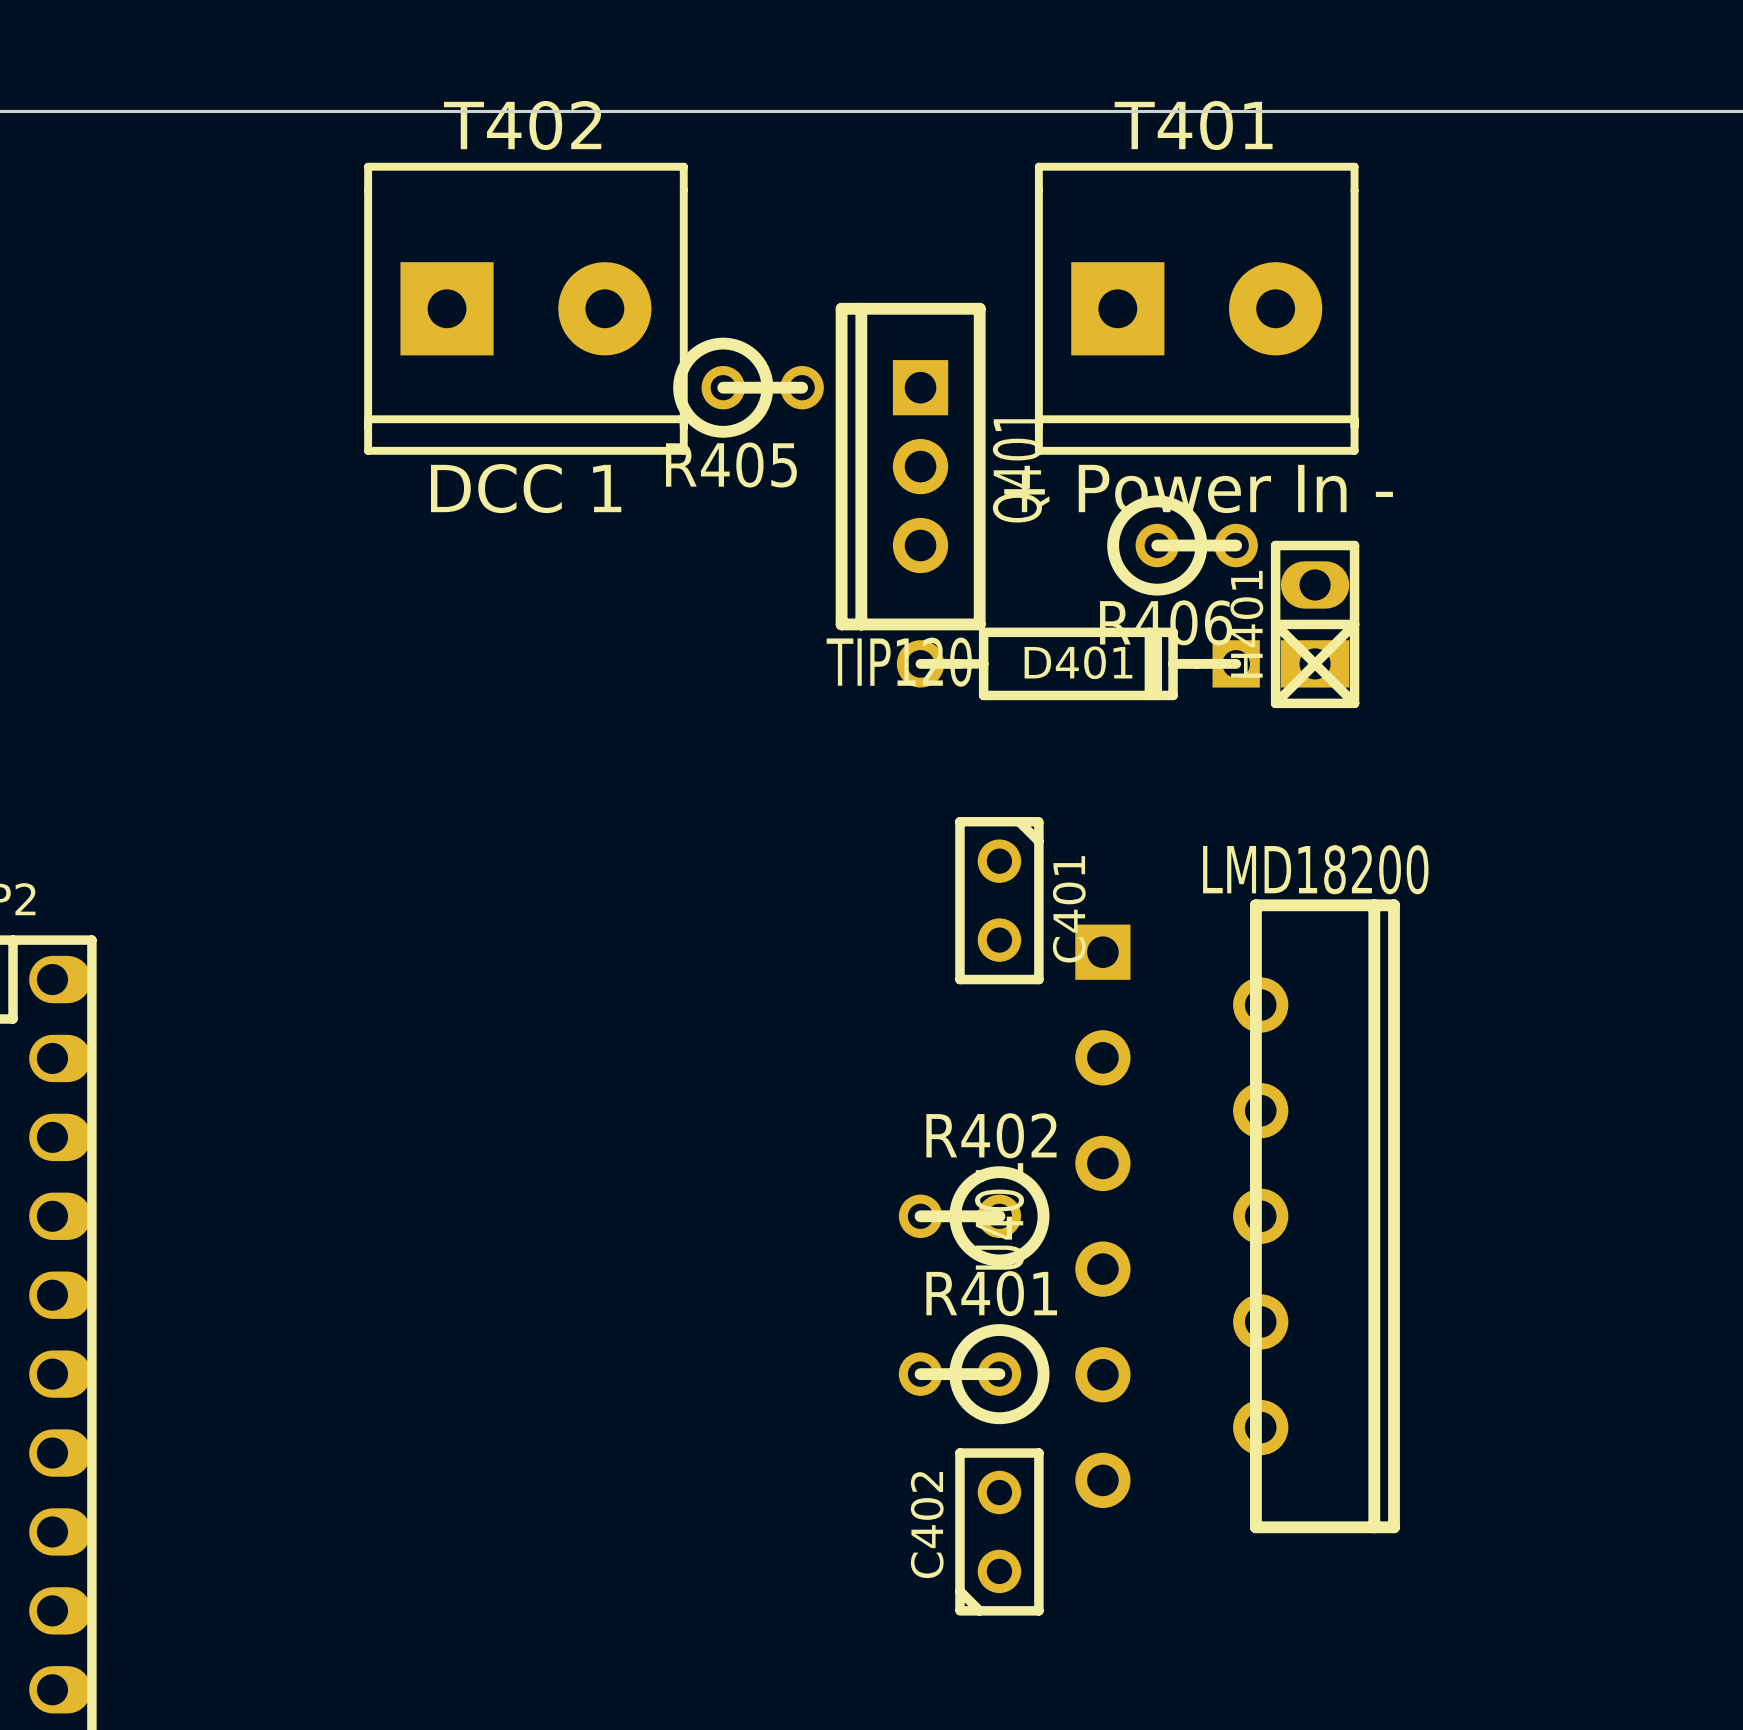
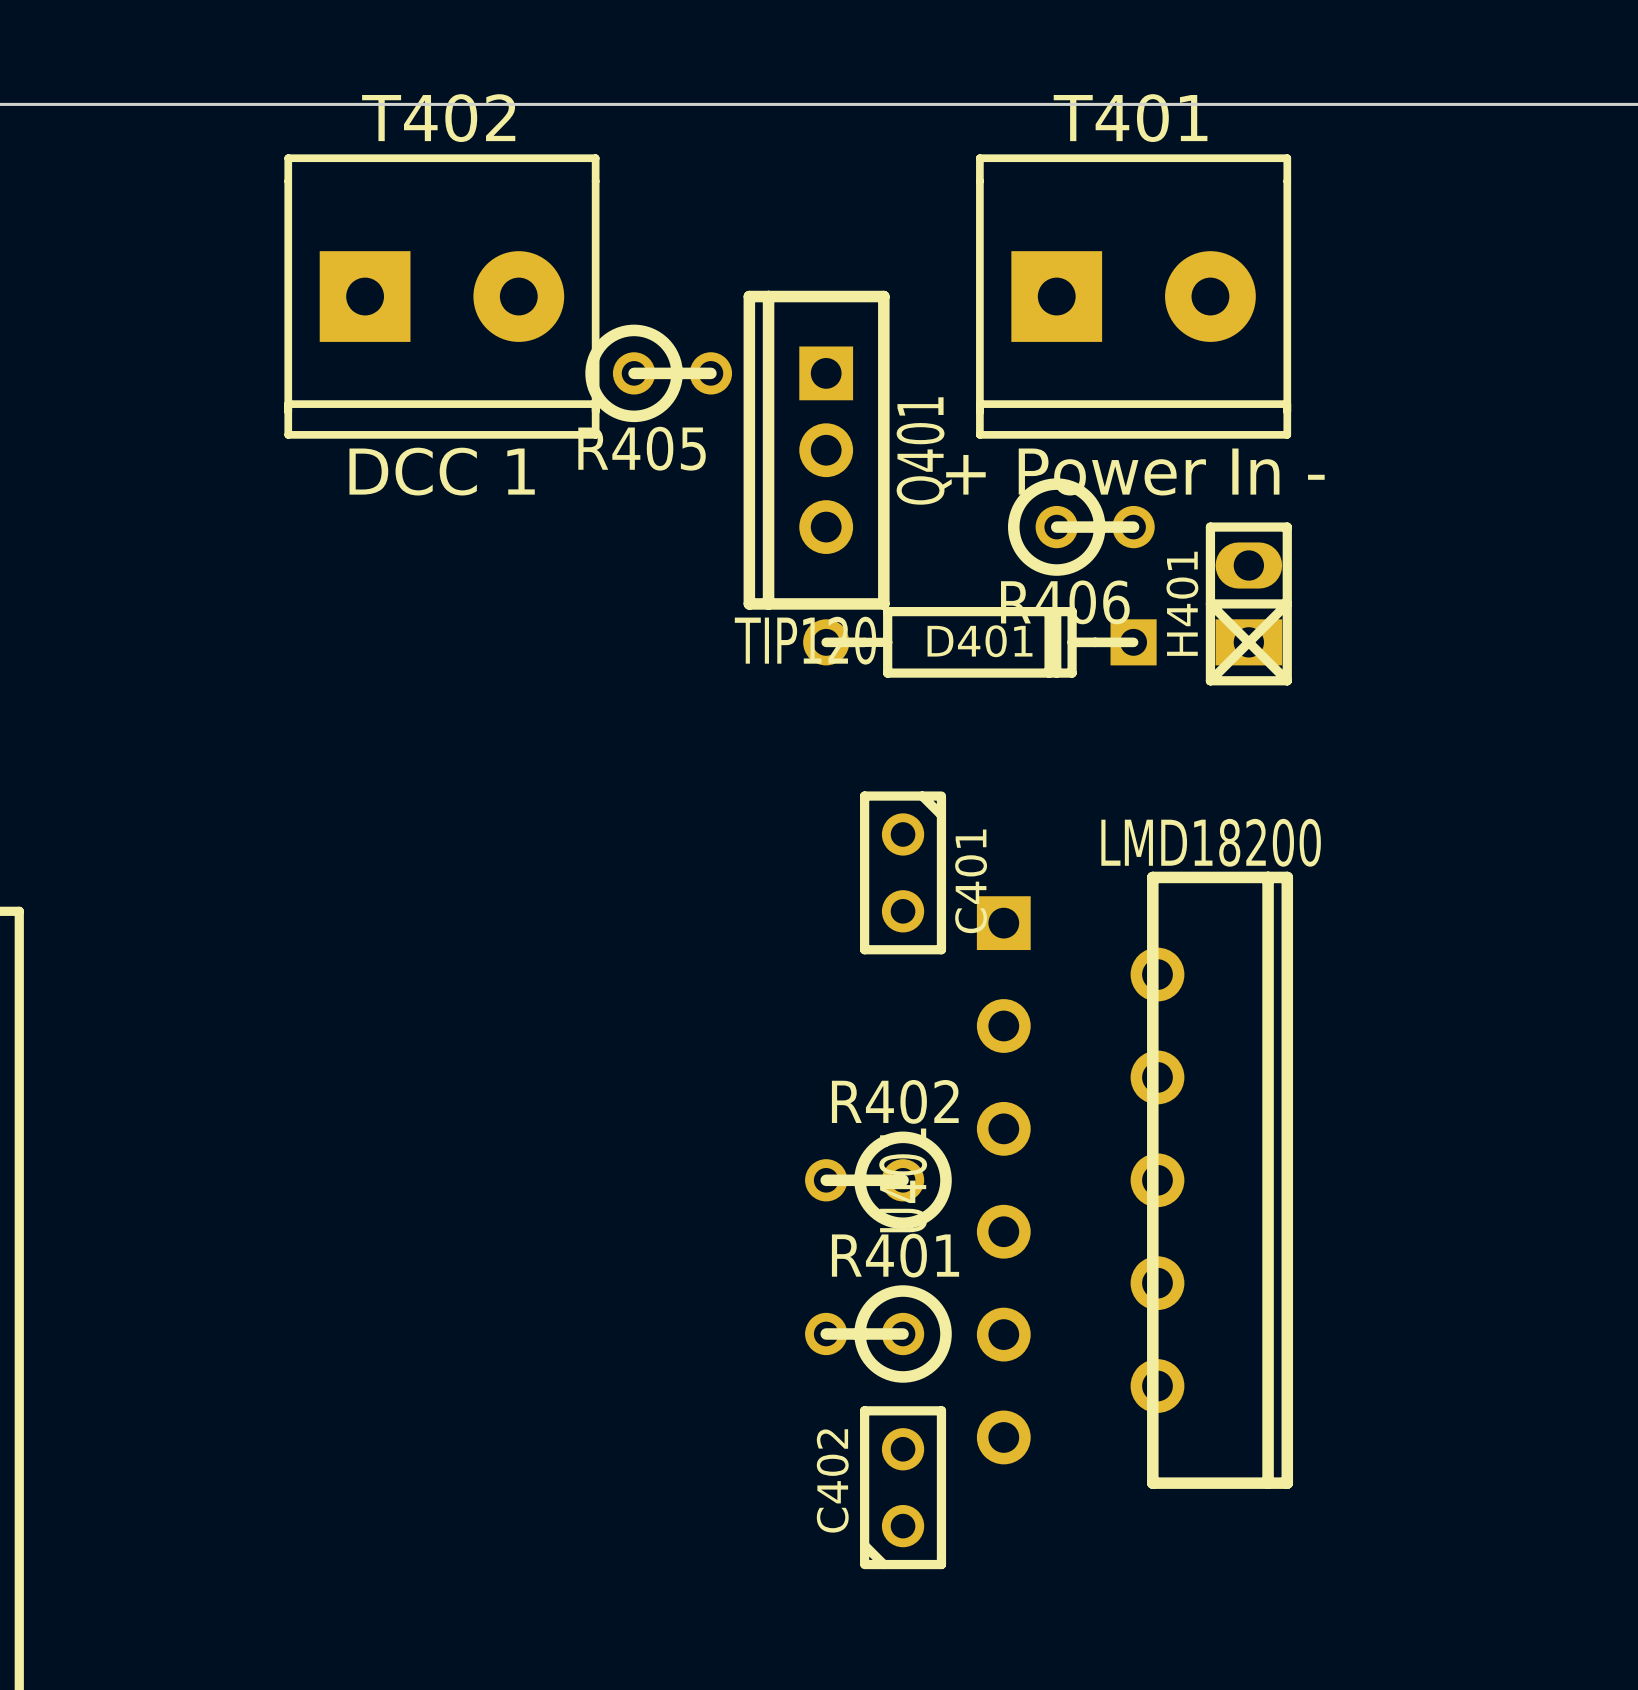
T401 position: (1196, 308) -> (1133, 296)
H401 position: (1315, 624) -> (1248, 603)

